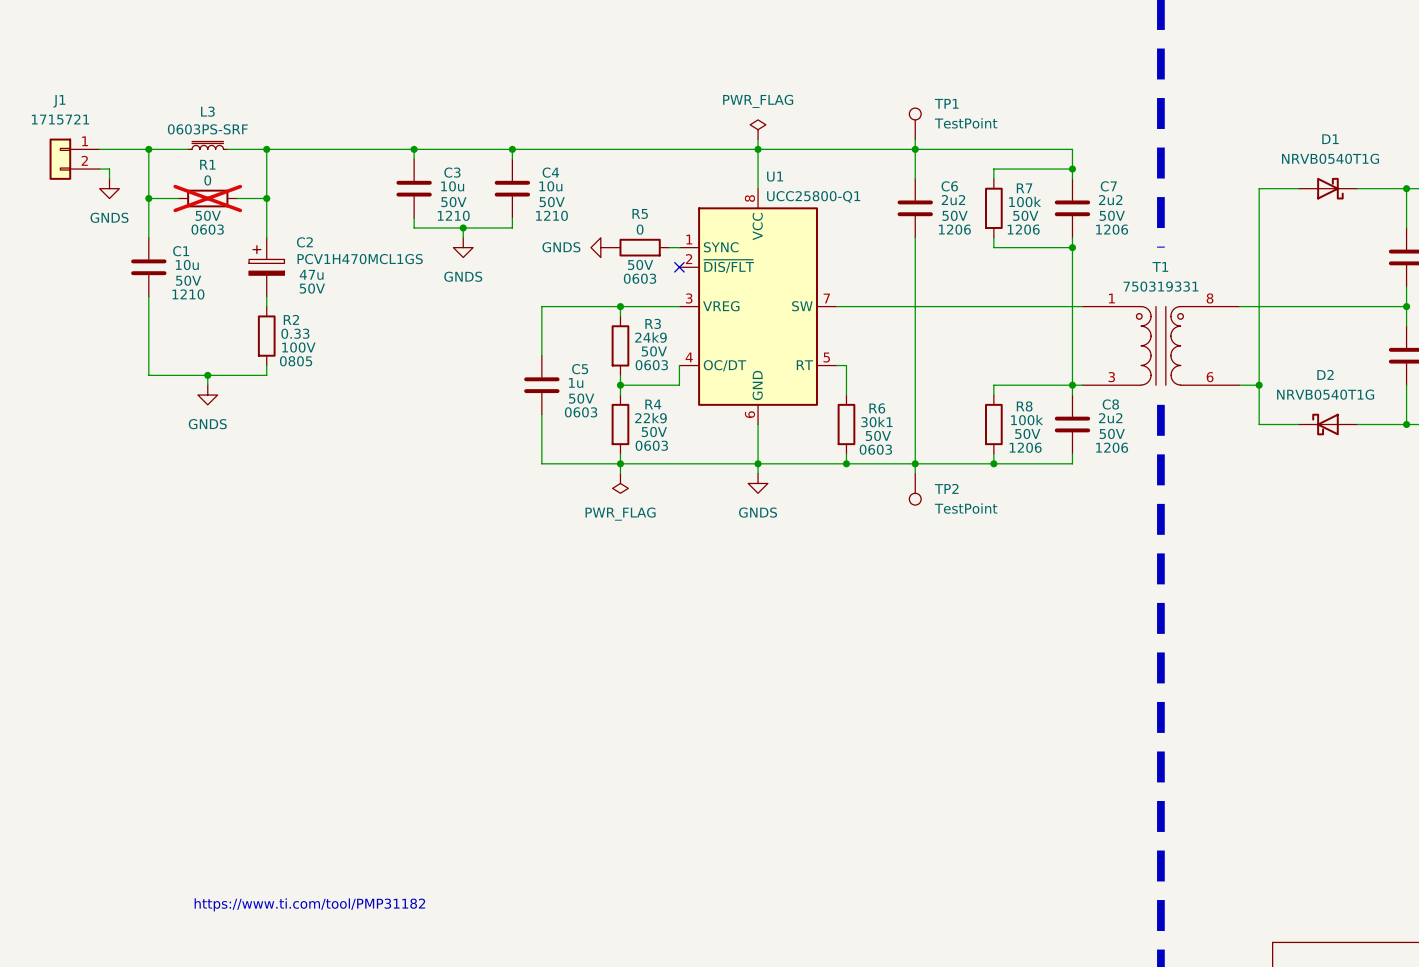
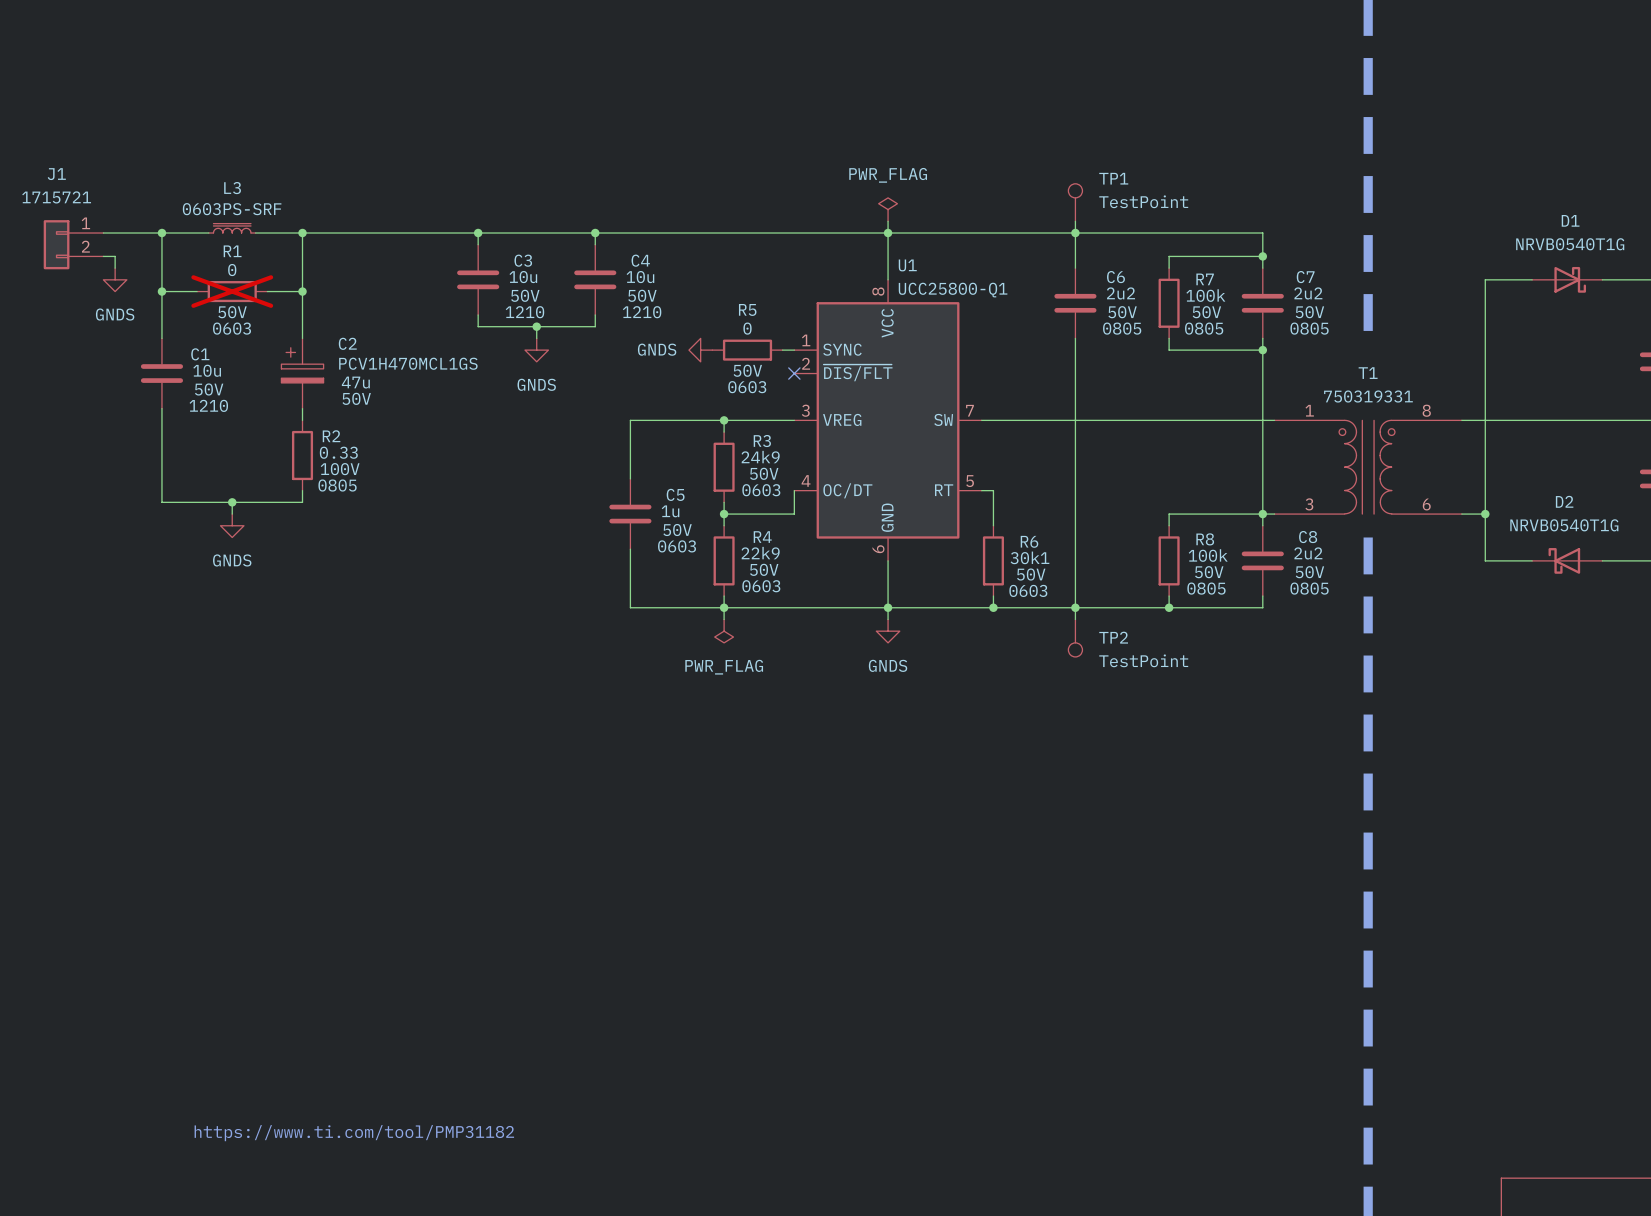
C6 text: 1206 (954, 229) -> 0805 (1122, 328)
R7 text: 1206 (1023, 229) -> 0805 (1204, 328)
C7 text: 1206 (1112, 229) -> 0805 (1309, 328)
R8 text: 1206 (1025, 447) -> 0805 (1206, 588)
C8 text: 1206 (1112, 447) -> 0805 (1309, 588)

